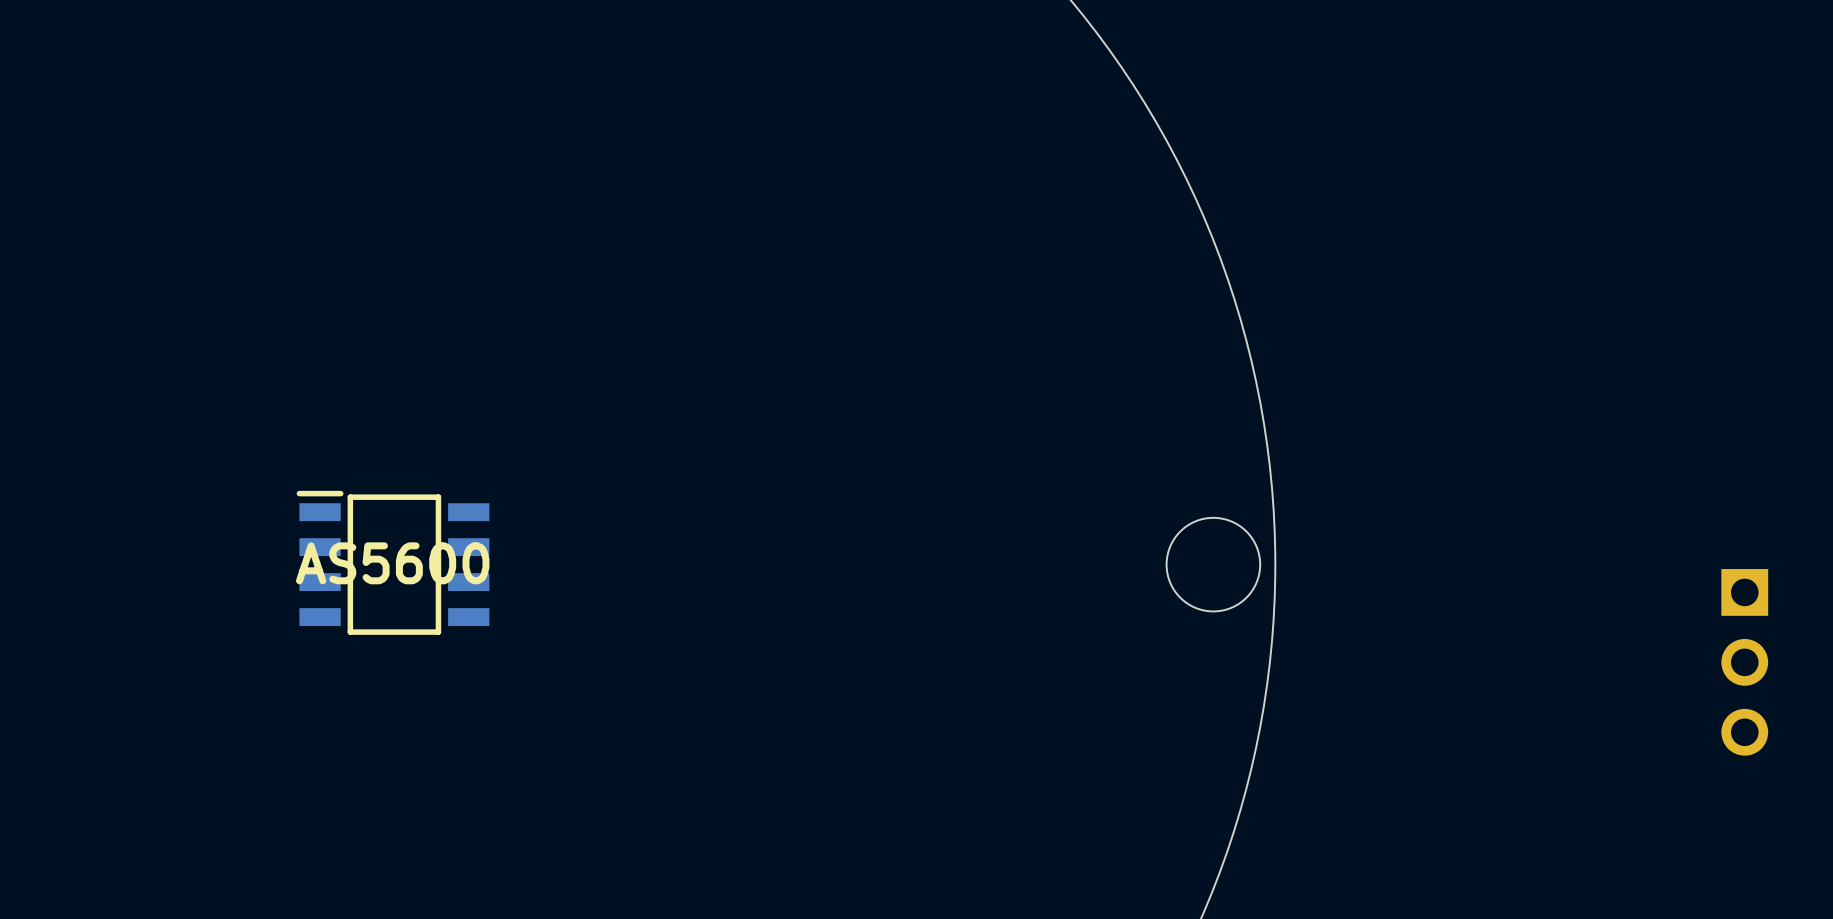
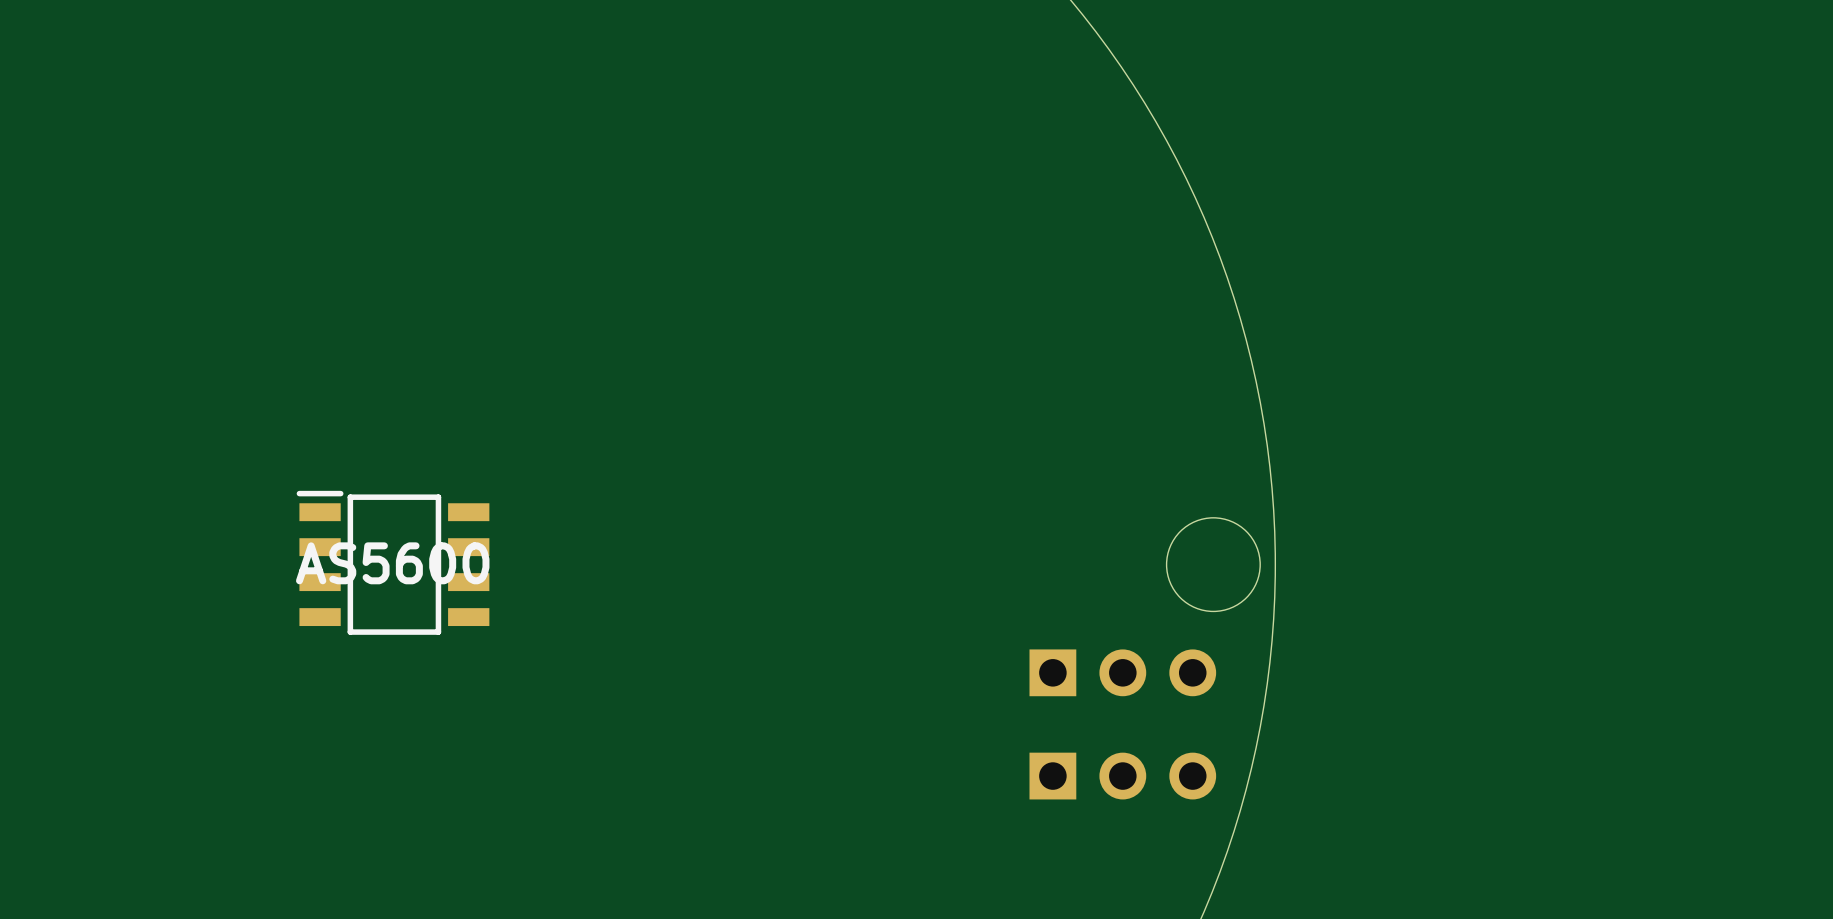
part: (1744, 662) -> none
part: none -> (1122, 672)
part: none -> (1122, 776)

